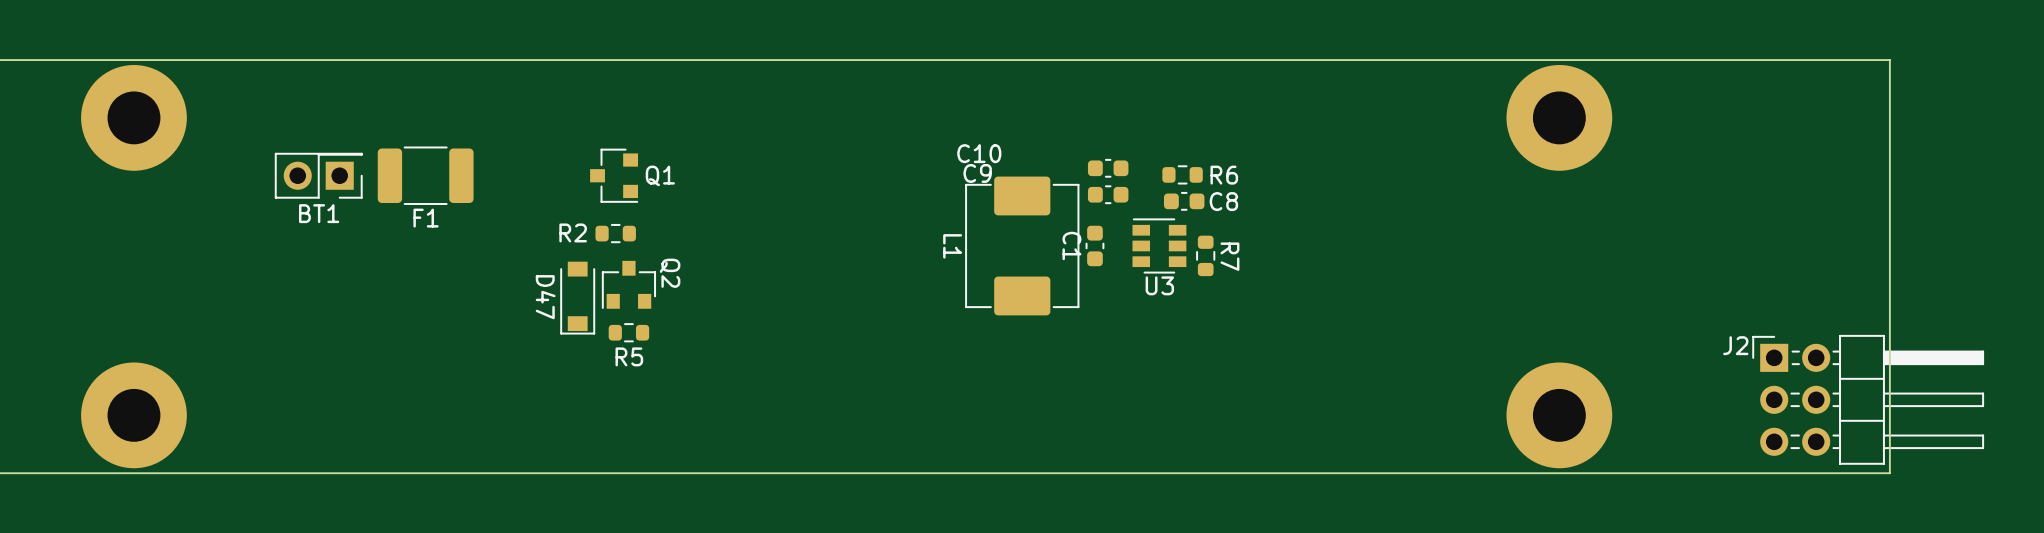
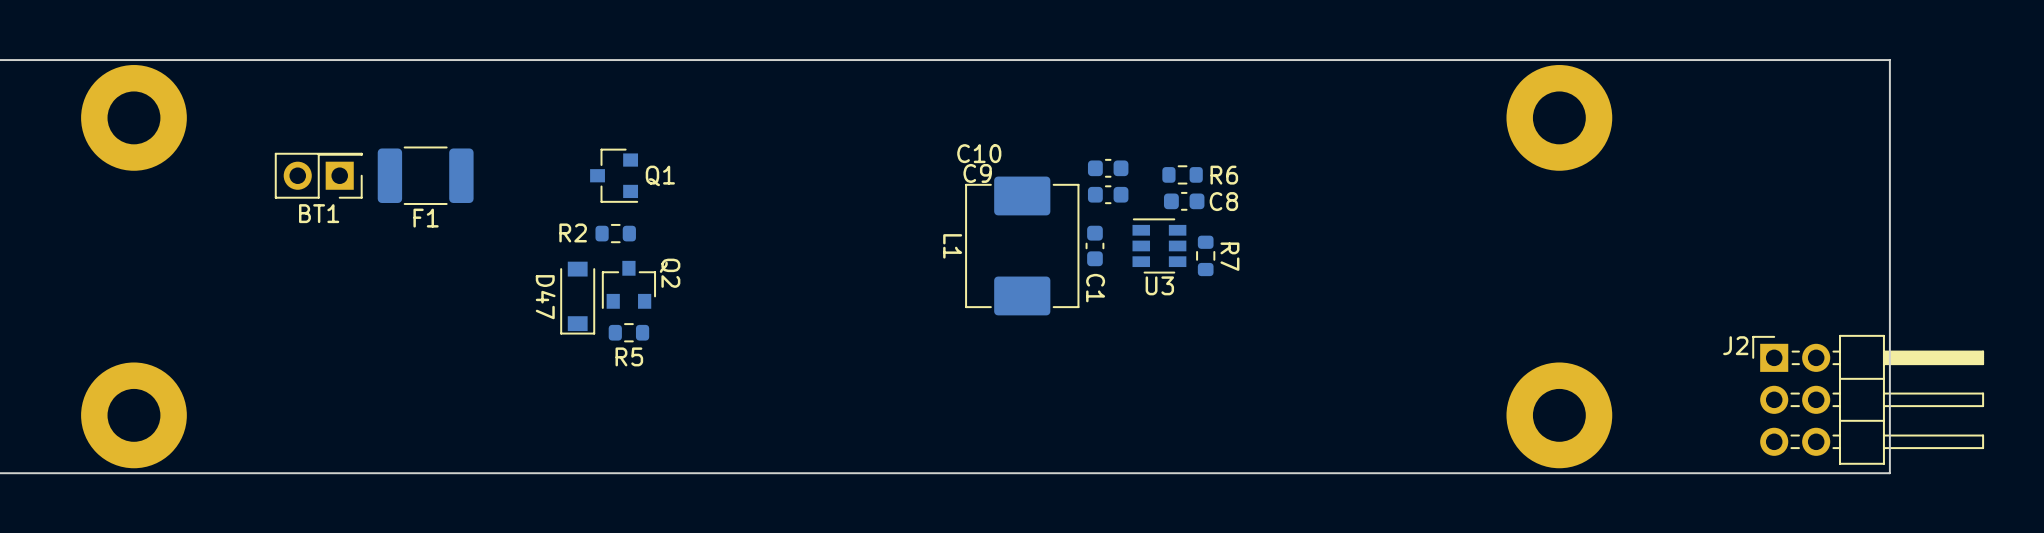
C1 name position: C1 (1071, 245) -> C1 (1095, 288)

